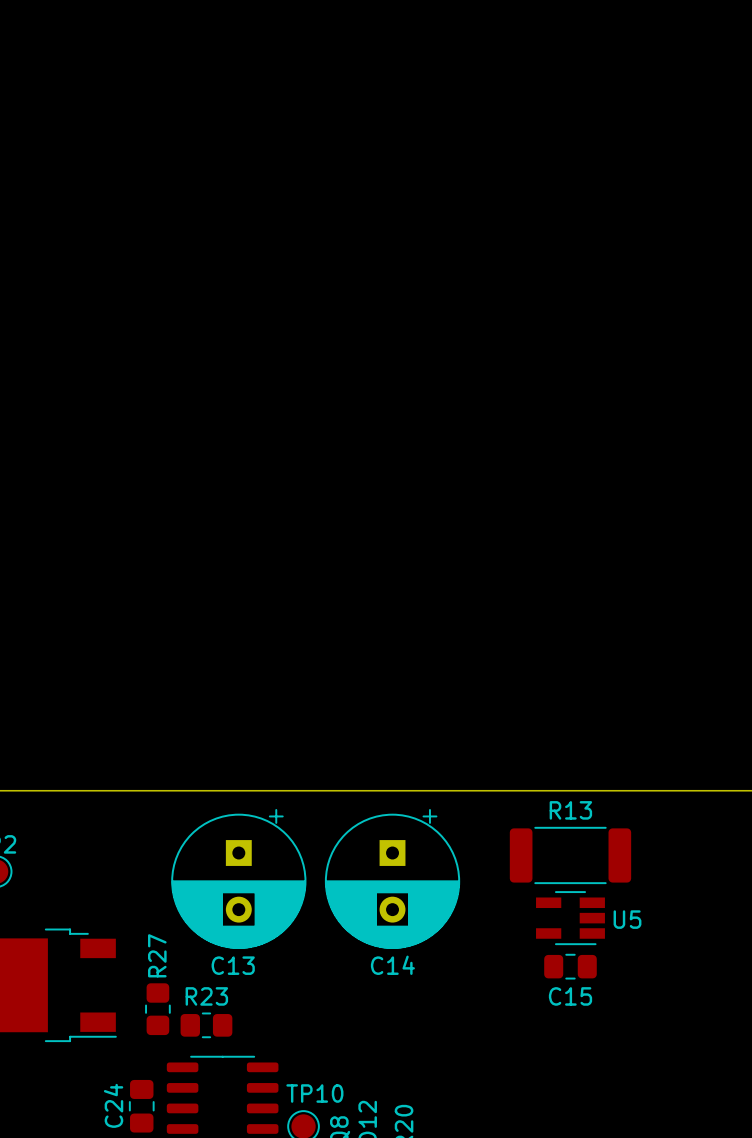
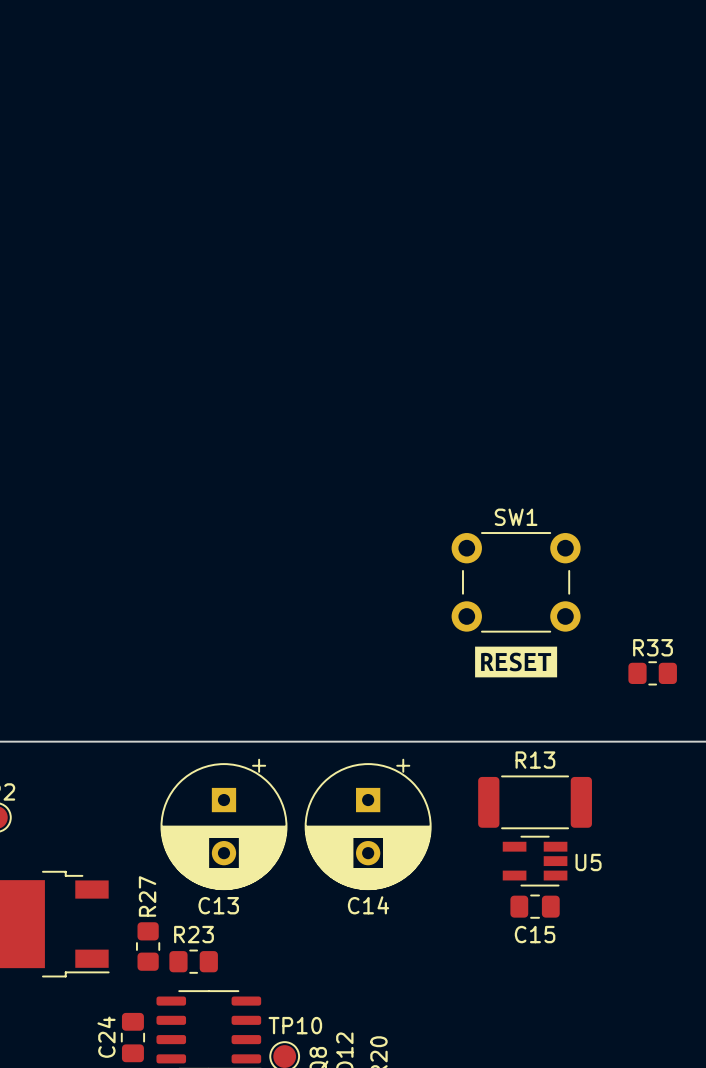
SW1: none -> (516, 582)
drawing: none -> [475, 646, 558, 678]
R33: none -> (652, 673)

